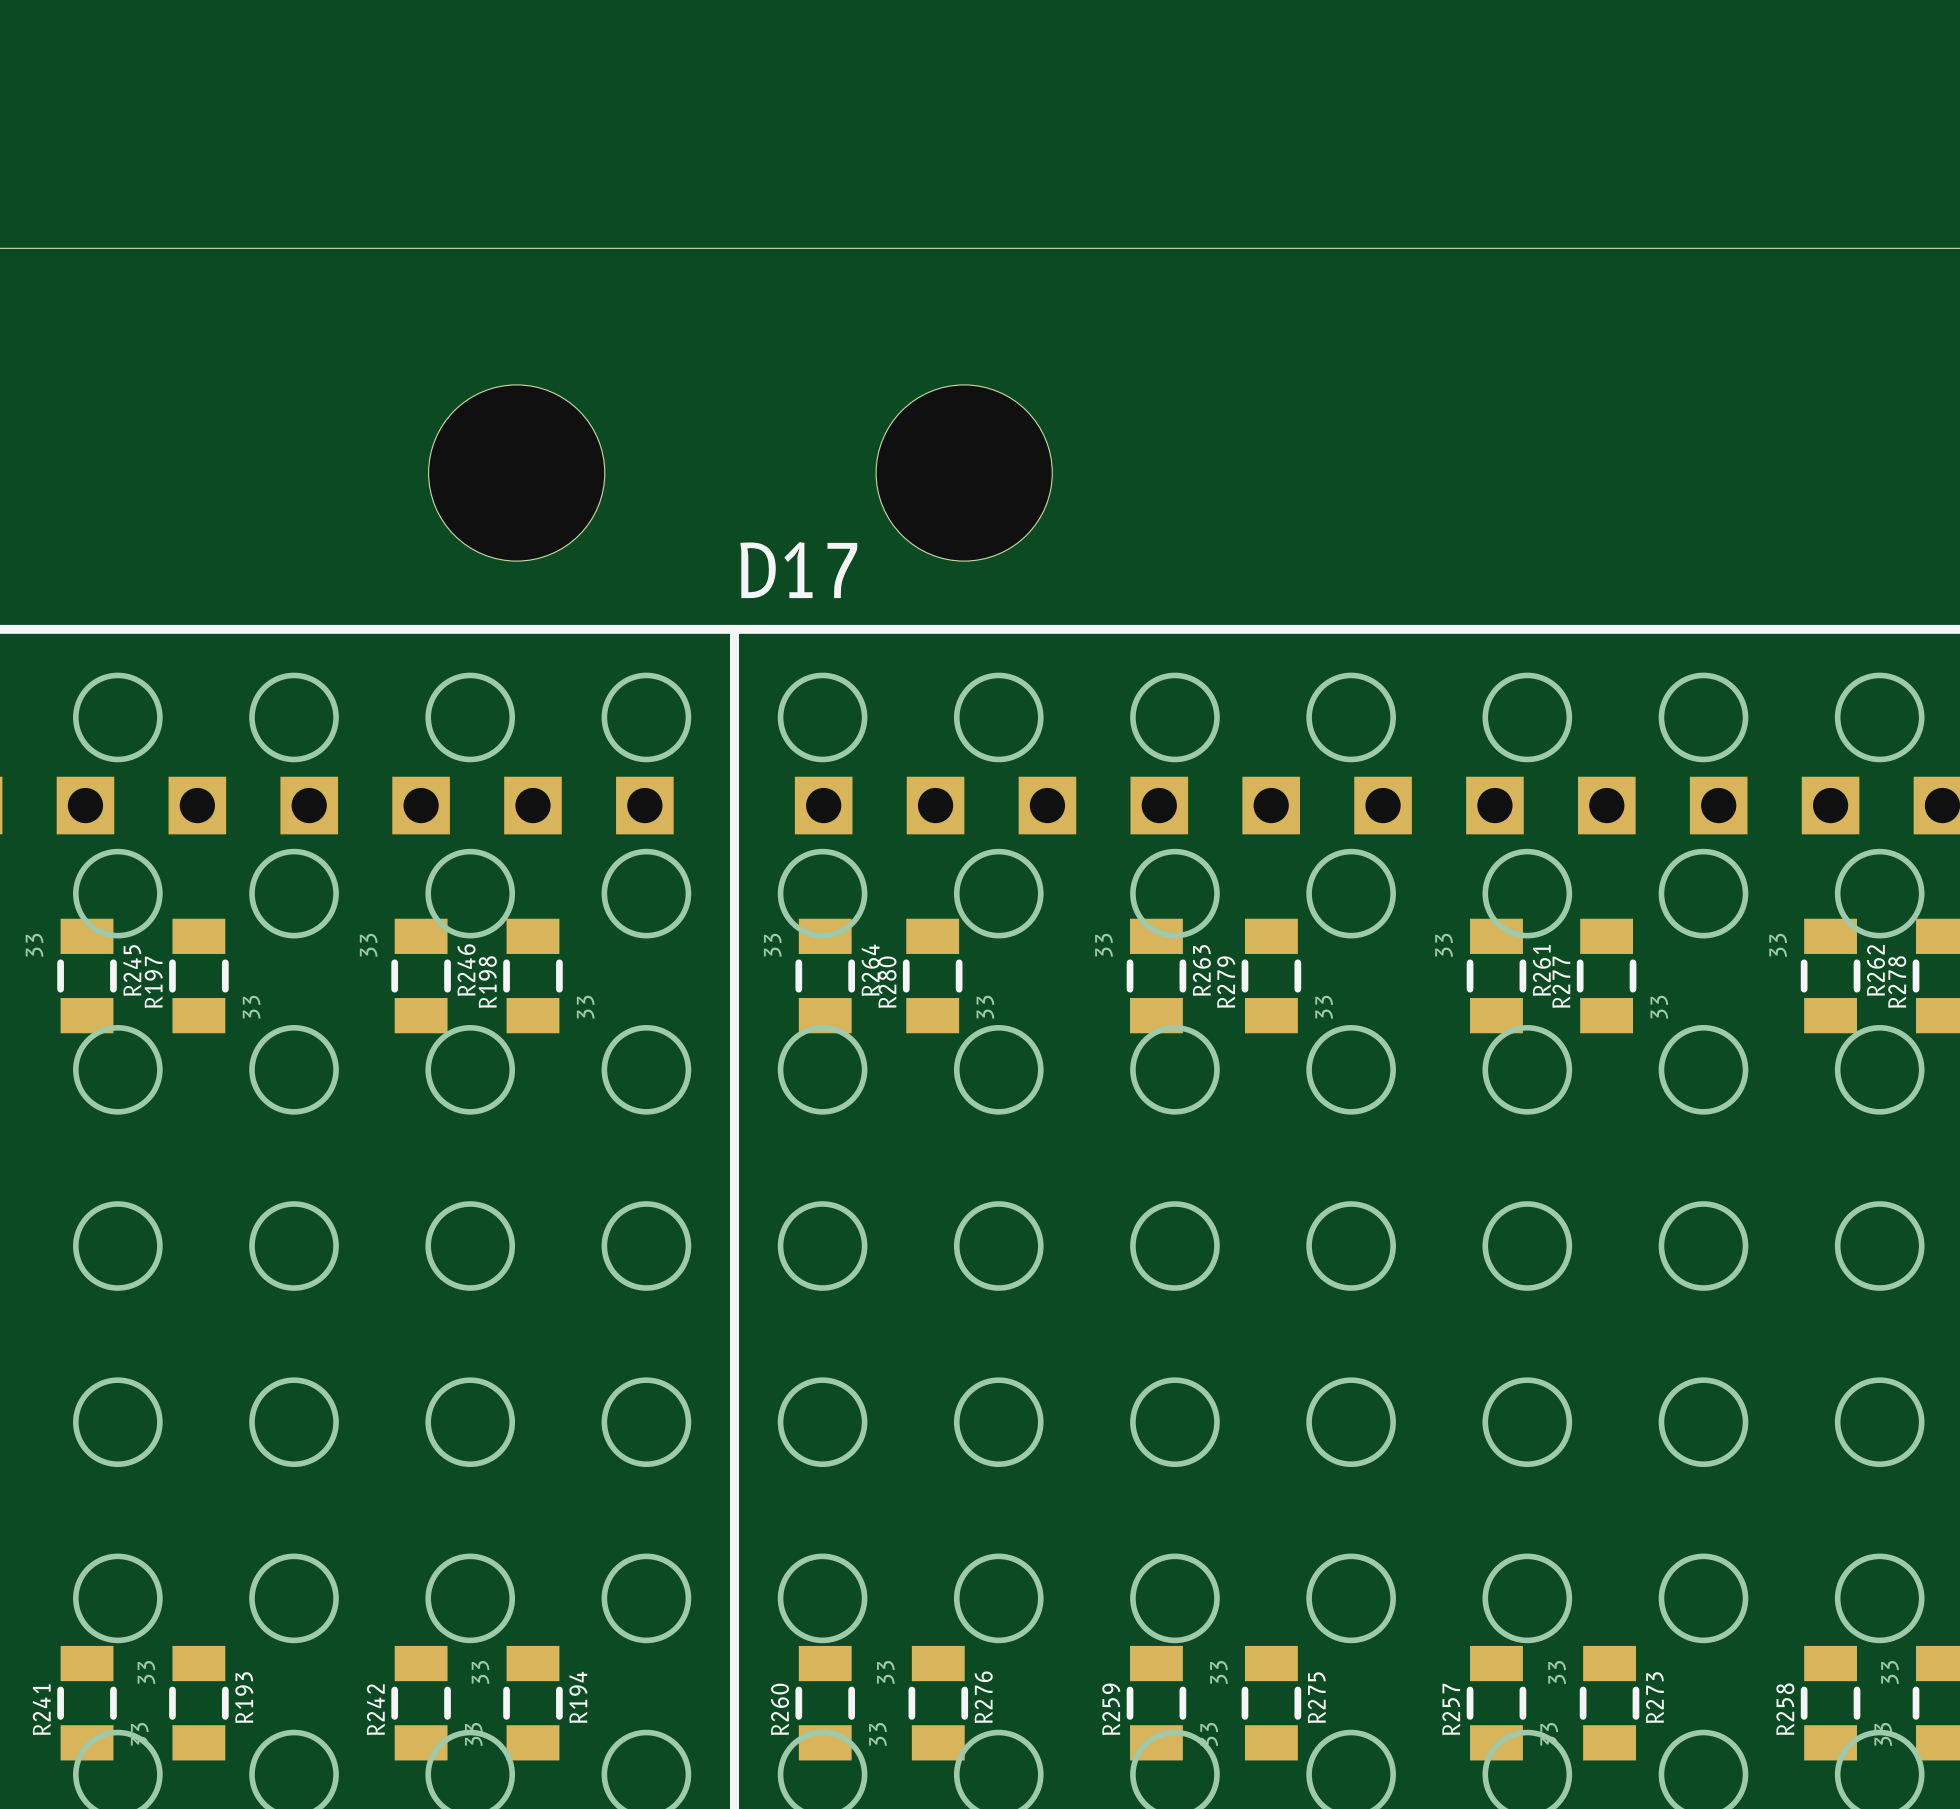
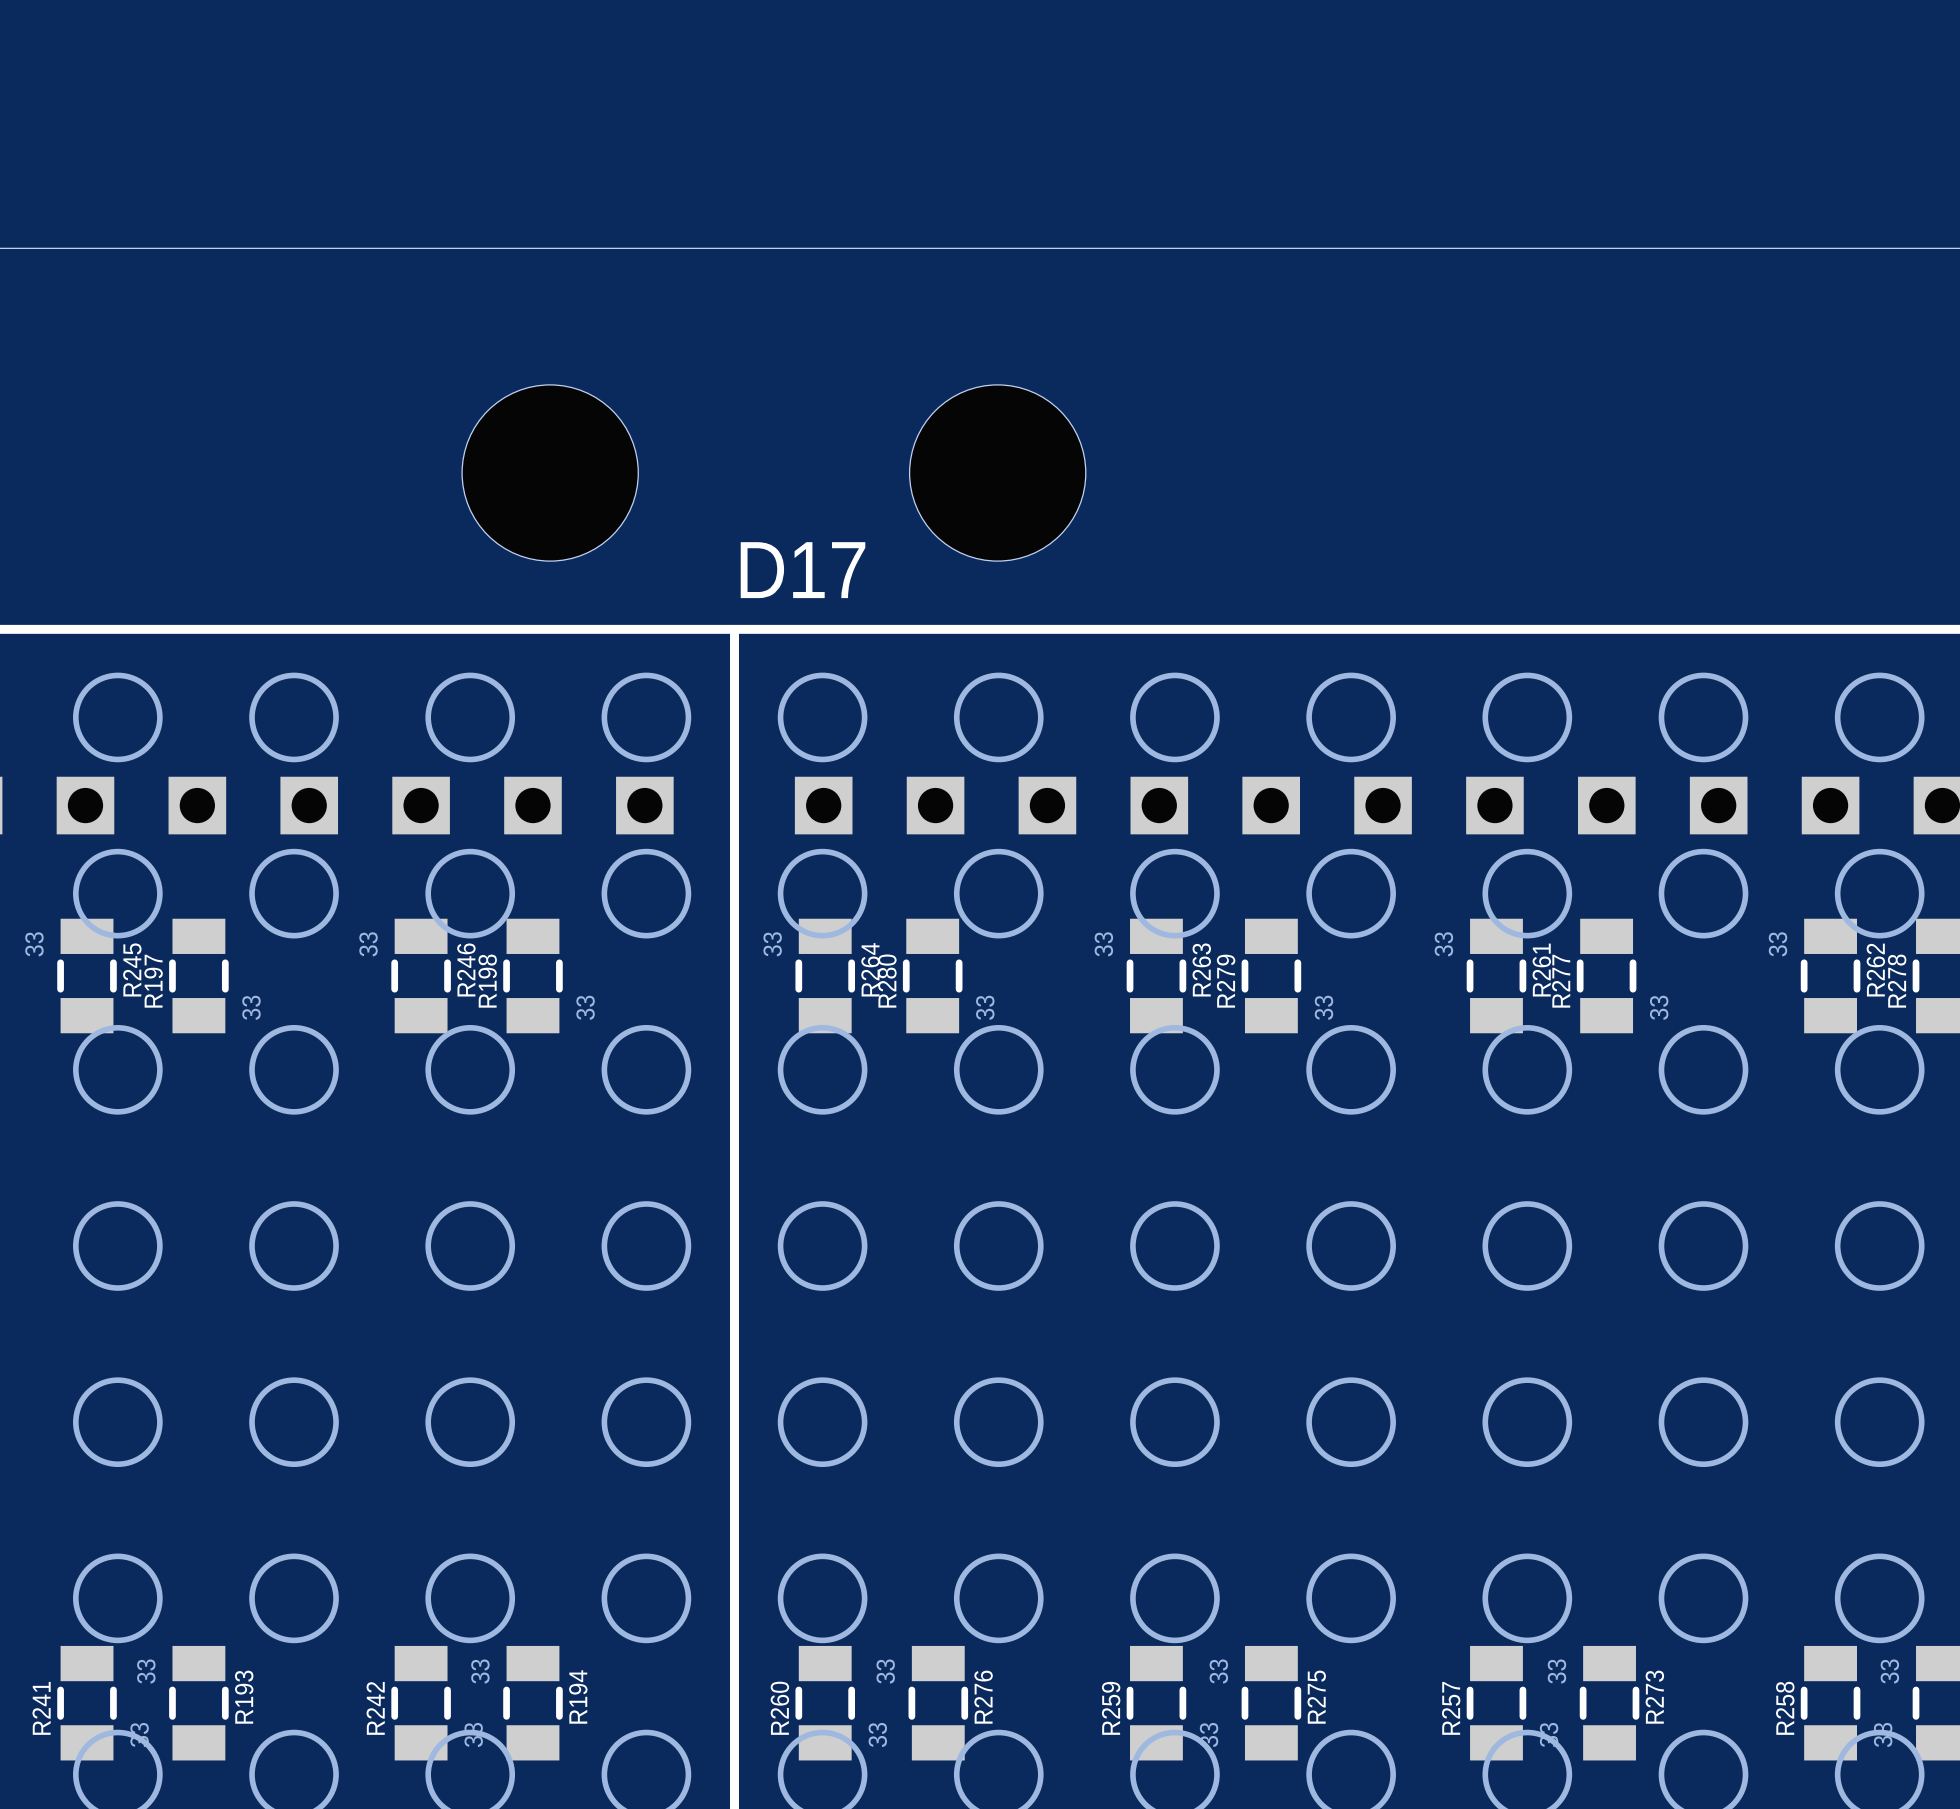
hole position: (516, 473) -> (550, 473)
hole position: (964, 473) -> (997, 473)

